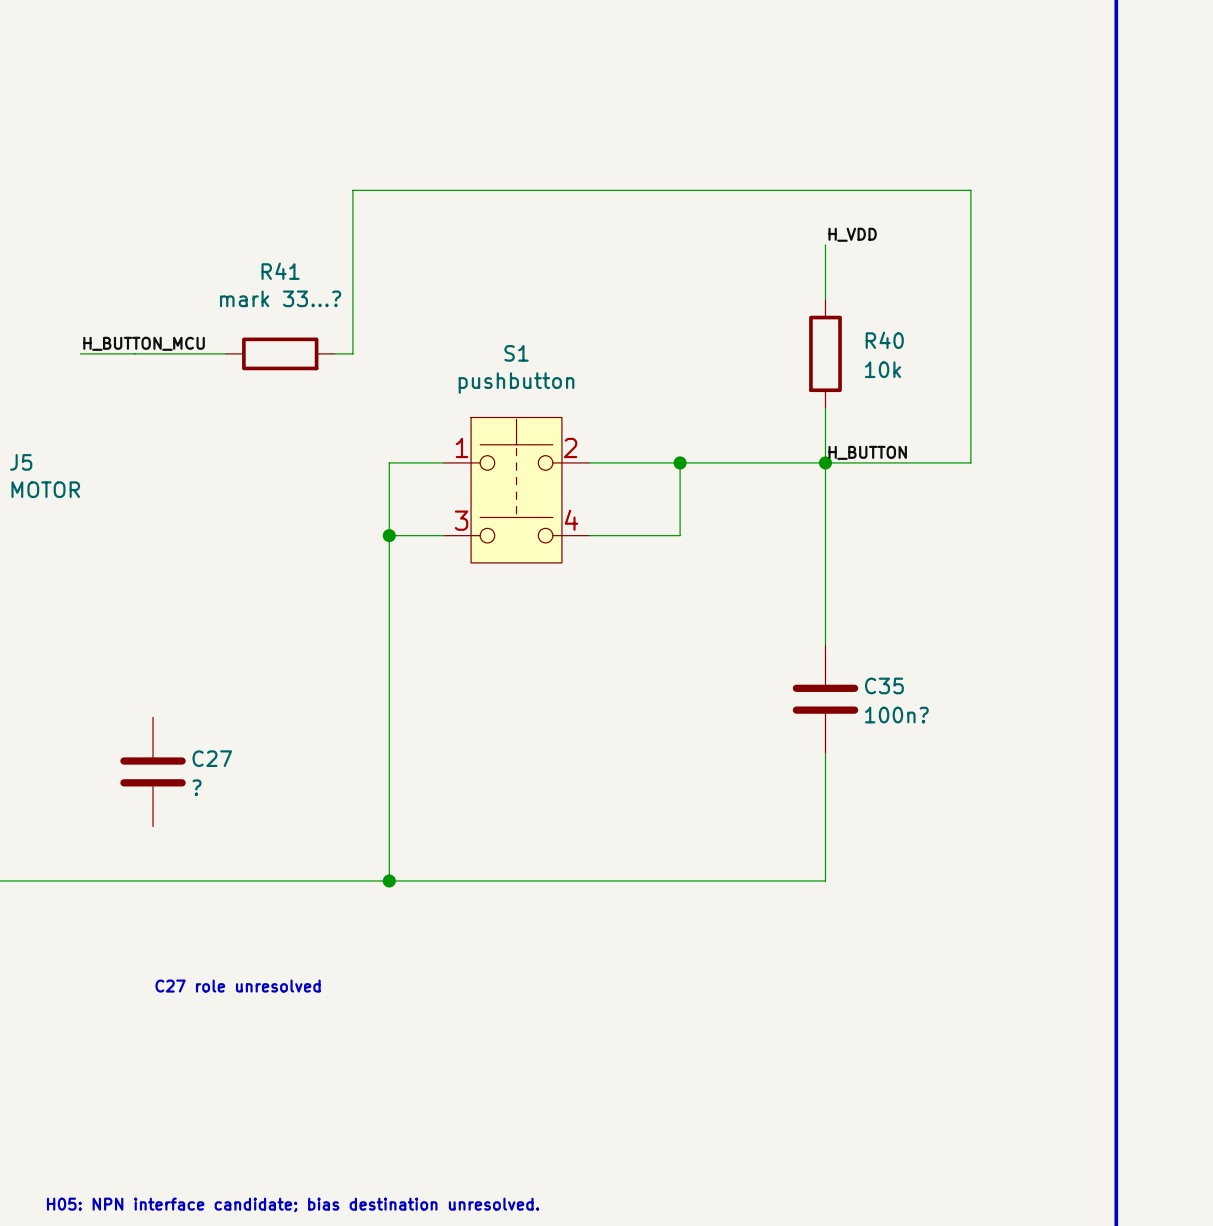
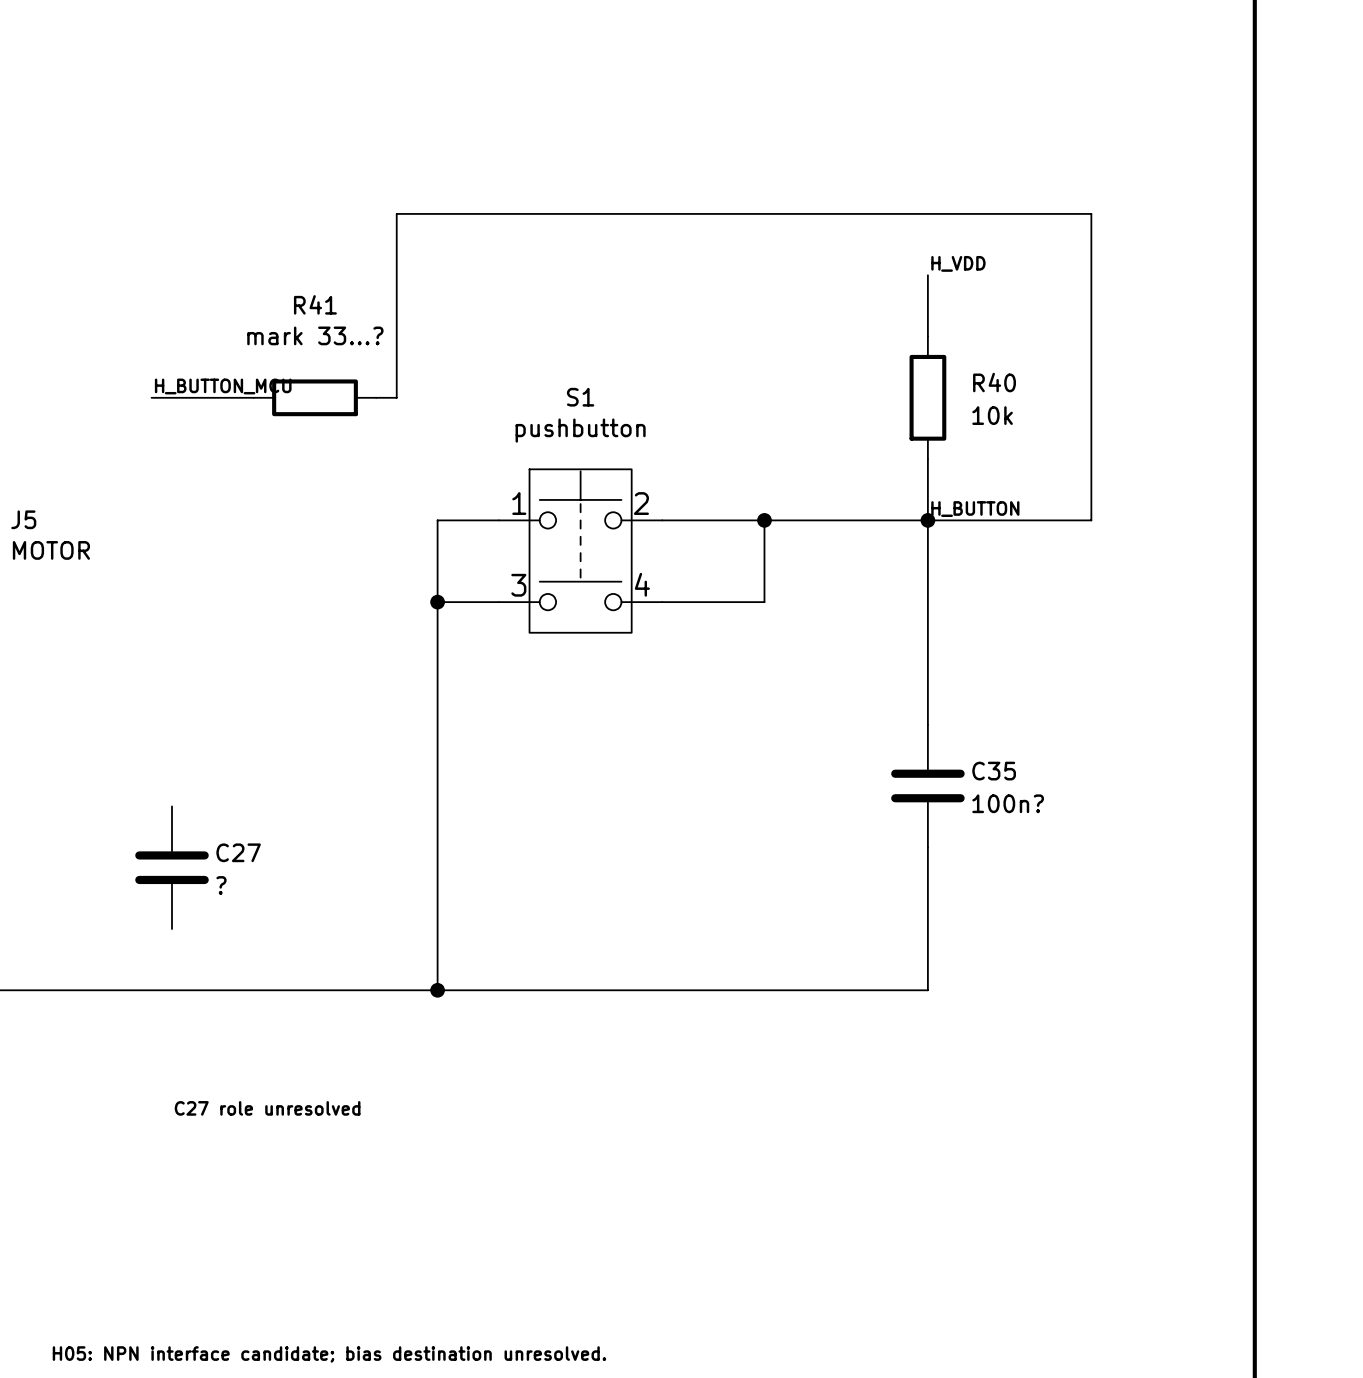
label position: H_BUTTON_MCU (144, 343) -> H_BUTTON_MCU (223, 386)
wire: (80, 353) (134, 353) -> none

